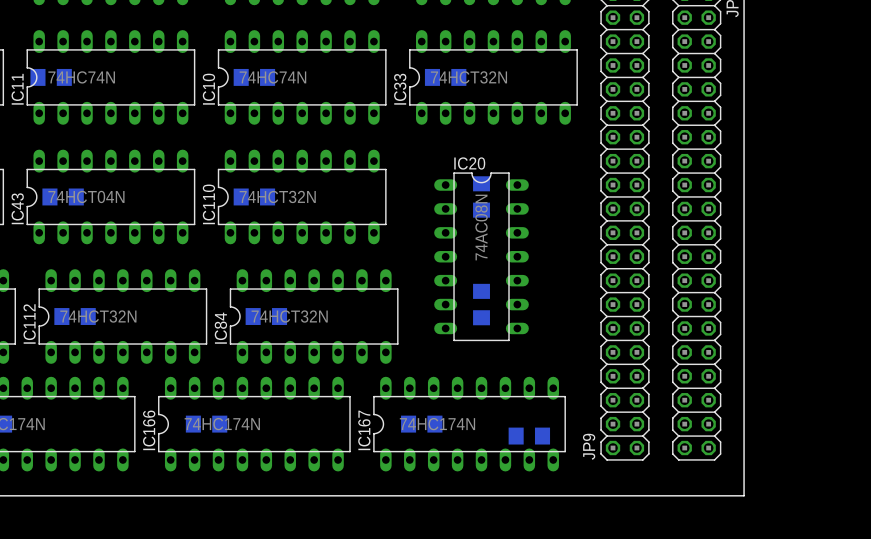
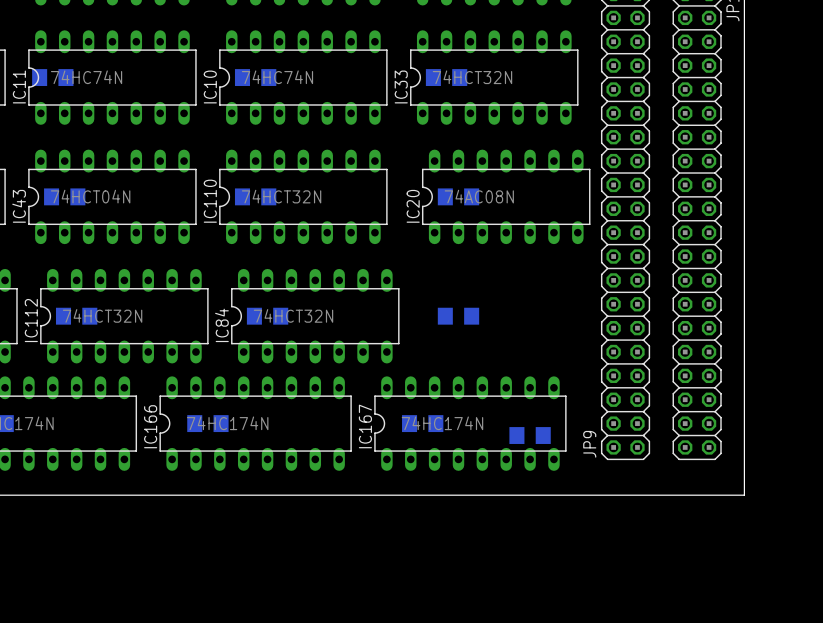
part rotation: 0° (481, 196) -> 90° clockwise (458, 196)
IC20 rotation: 0° (481, 256) -> 90° counterclockwise (506, 196)
part rotation: 0° (481, 304) -> 90° clockwise (458, 316)
part position: (481, 304) -> (458, 316)

